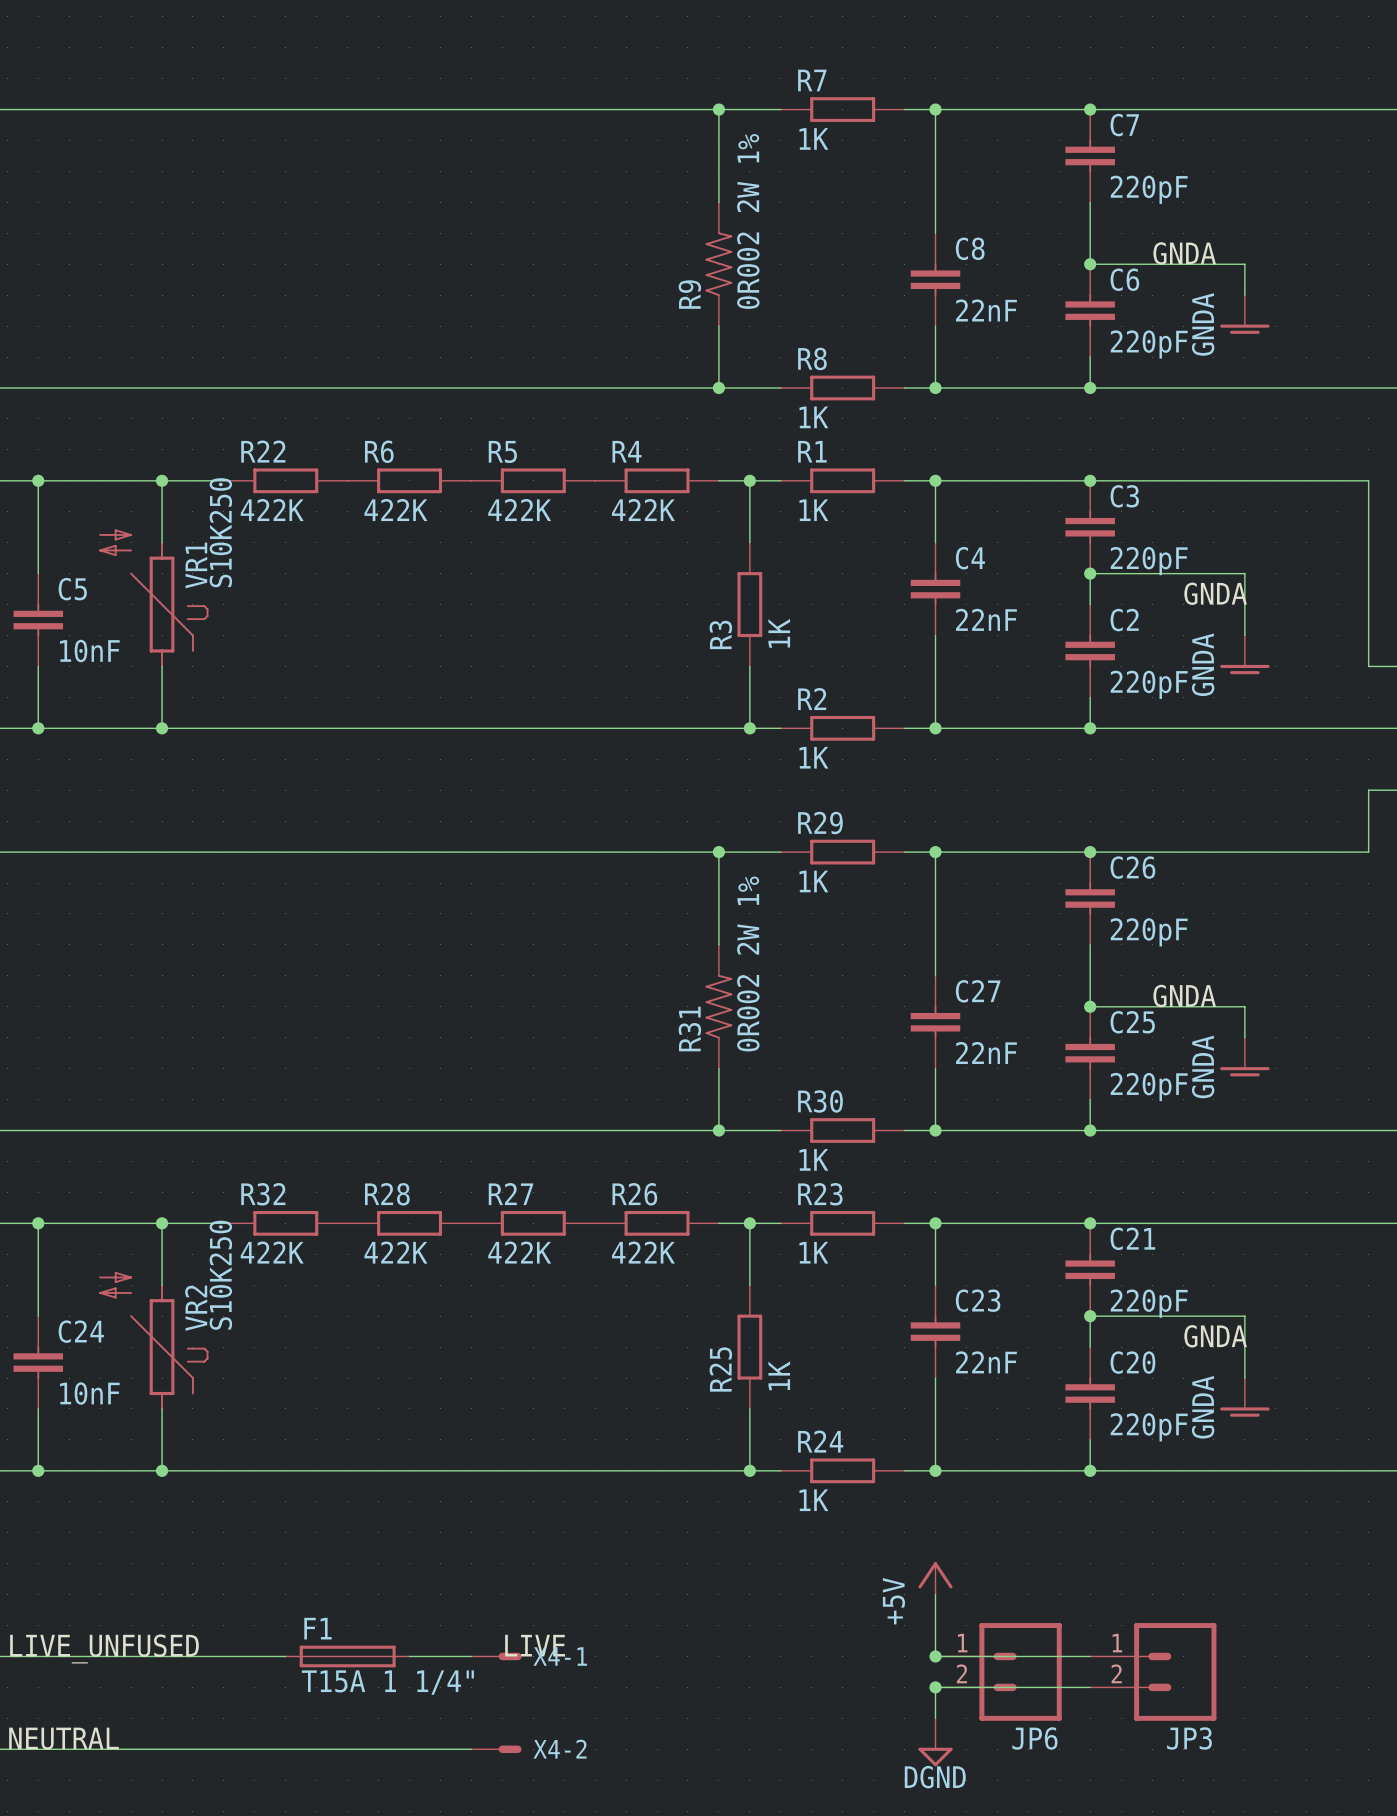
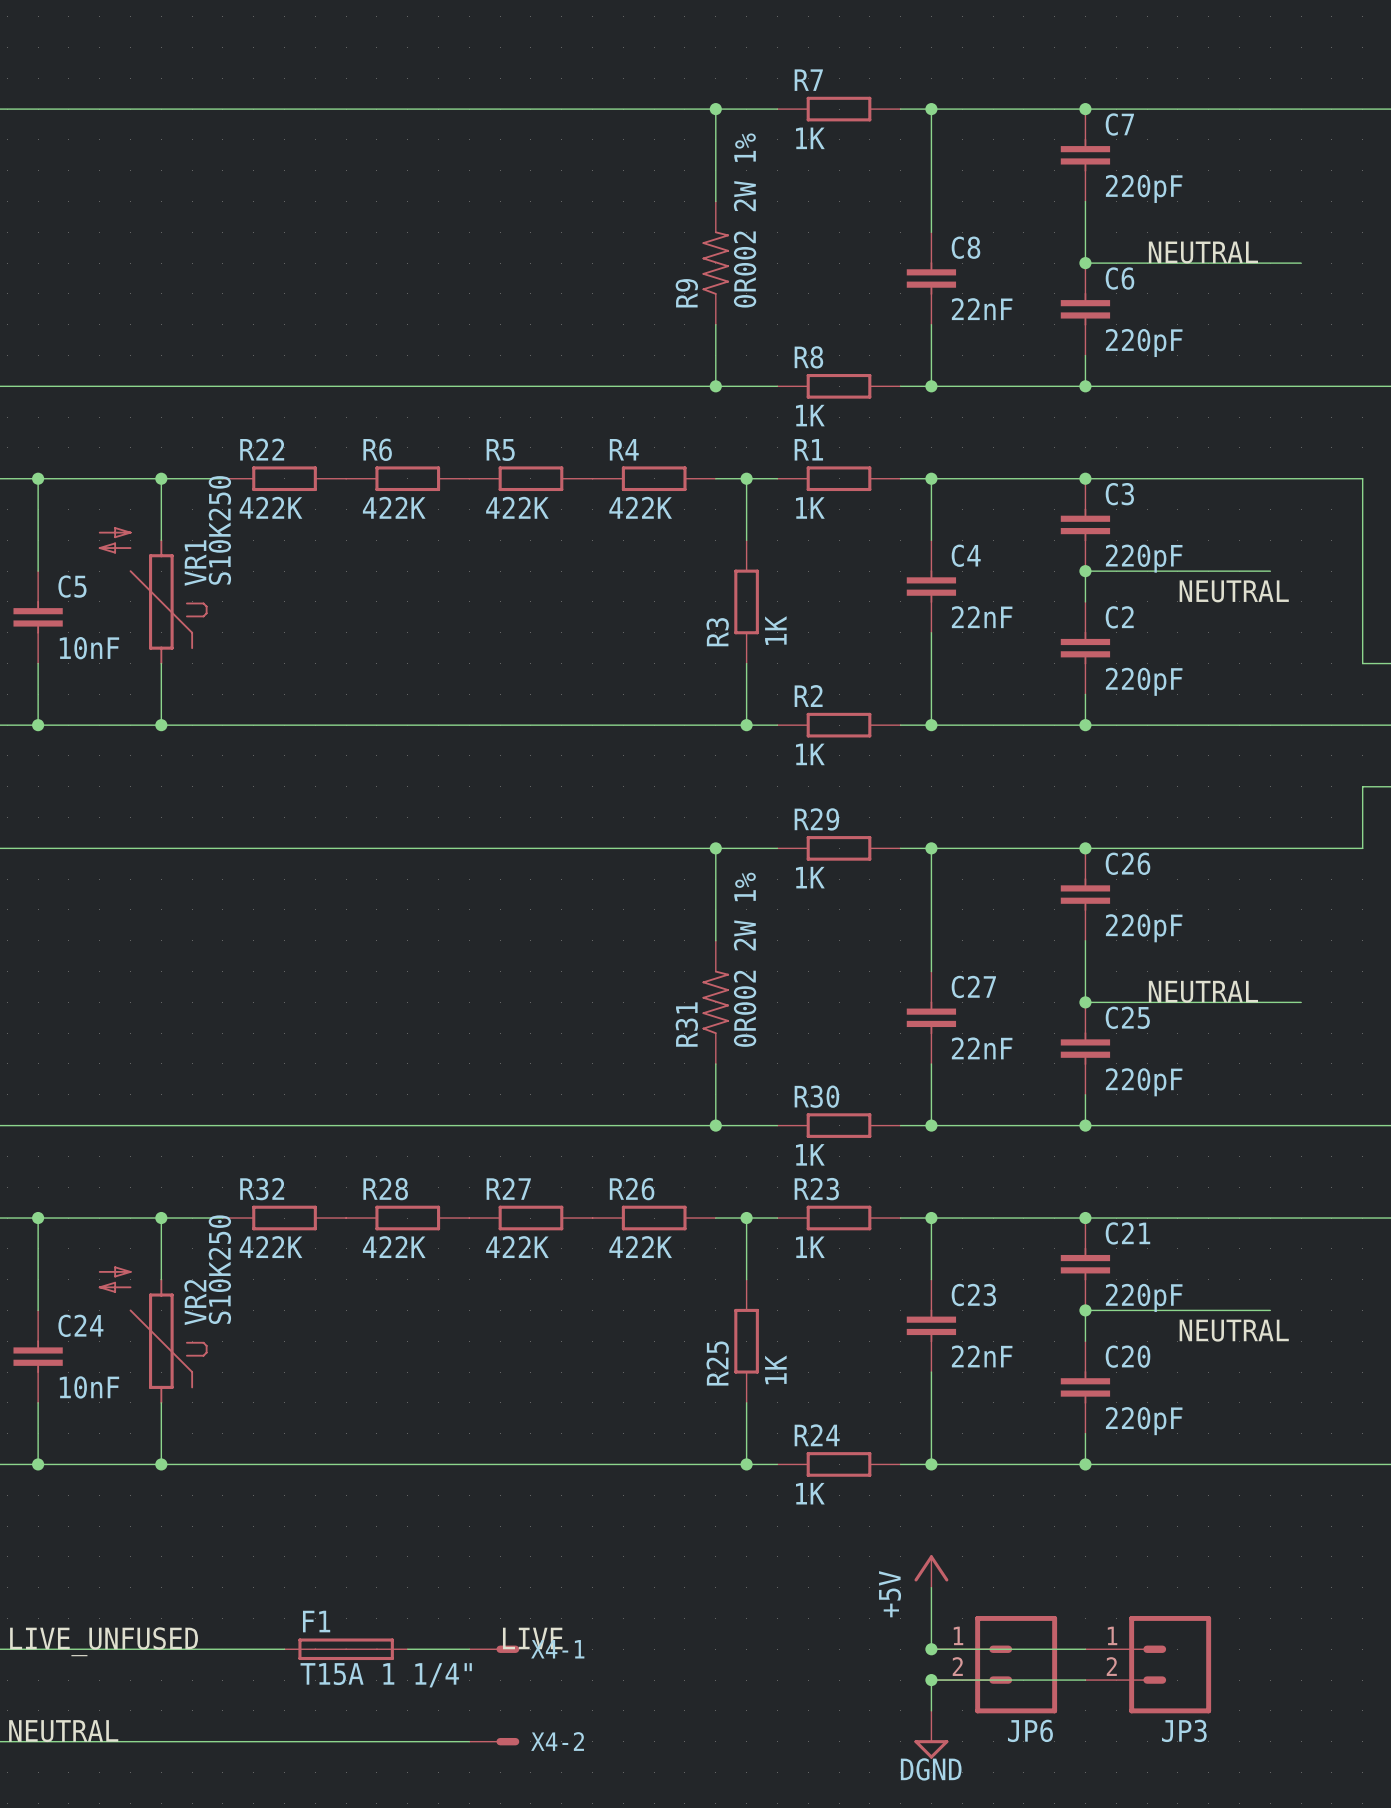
label: GNDA (1184, 253) -> NEUTRAL (1203, 252)
wire: (1244, 264) (1244, 295) -> (1239, 263) (1301, 263)
power symbol: GNDA (1244, 314) -> none
wire: (1244, 573) (1244, 635) -> (1239, 571) (1270, 571)
label: GNDA (1215, 593) -> NEUTRAL (1234, 591)
power symbol: GNDA (1244, 654) -> none
label: GNDA (1184, 995) -> NEUTRAL (1203, 991)
wire: (1244, 1006) (1244, 1037) -> (1239, 1002) (1301, 1002)
power symbol: GNDA (1244, 1057) -> none
wire: (1244, 1316) (1244, 1378) -> (1239, 1310) (1270, 1310)
label: GNDA (1215, 1336) -> NEUTRAL (1234, 1330)
power symbol: GNDA (1244, 1397) -> none

